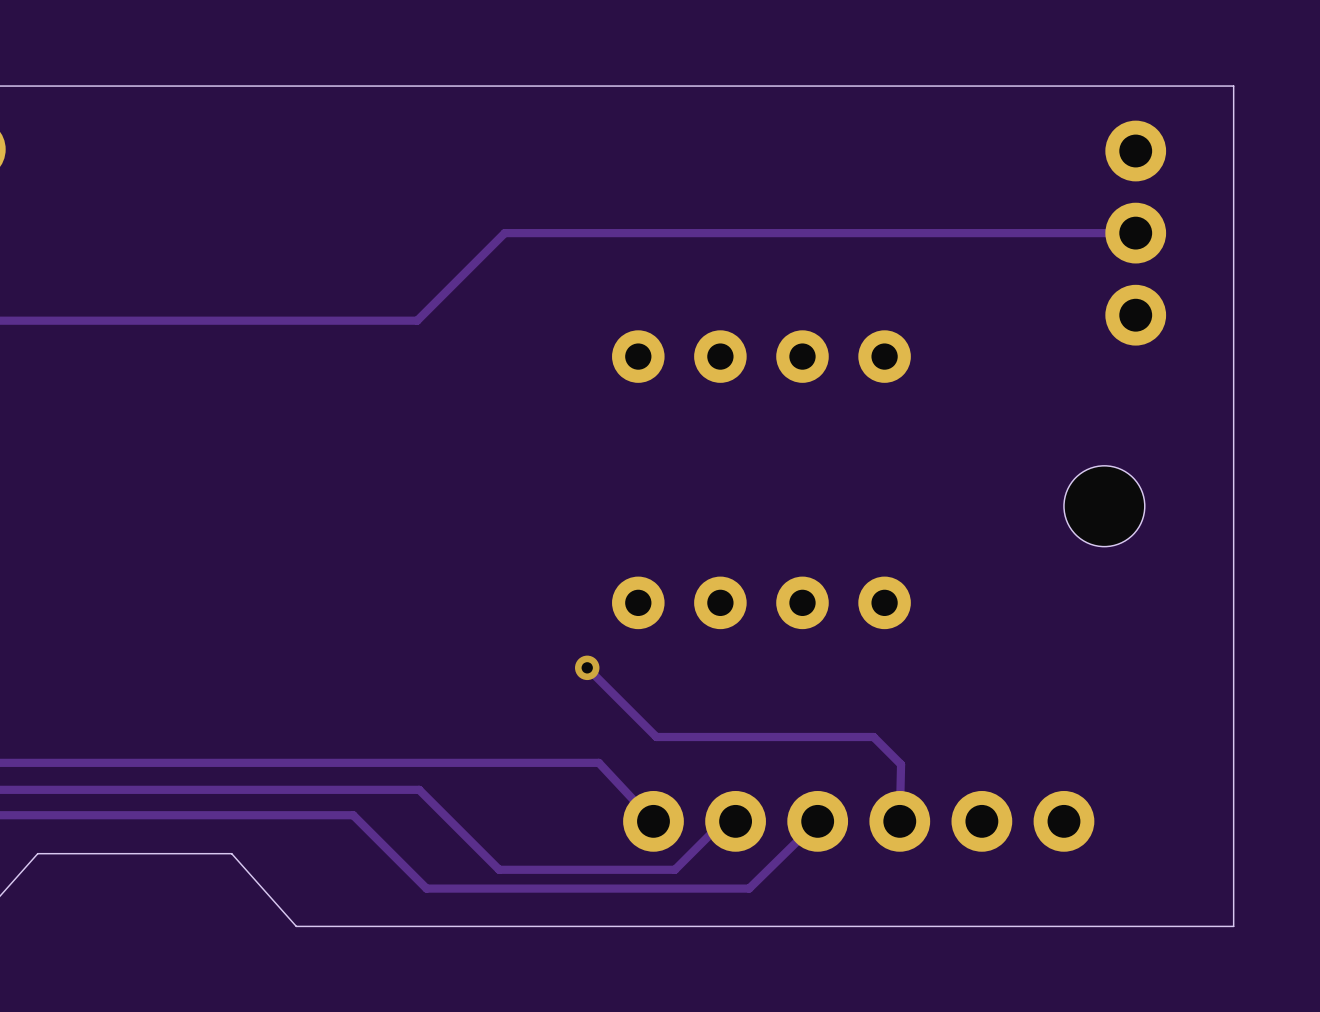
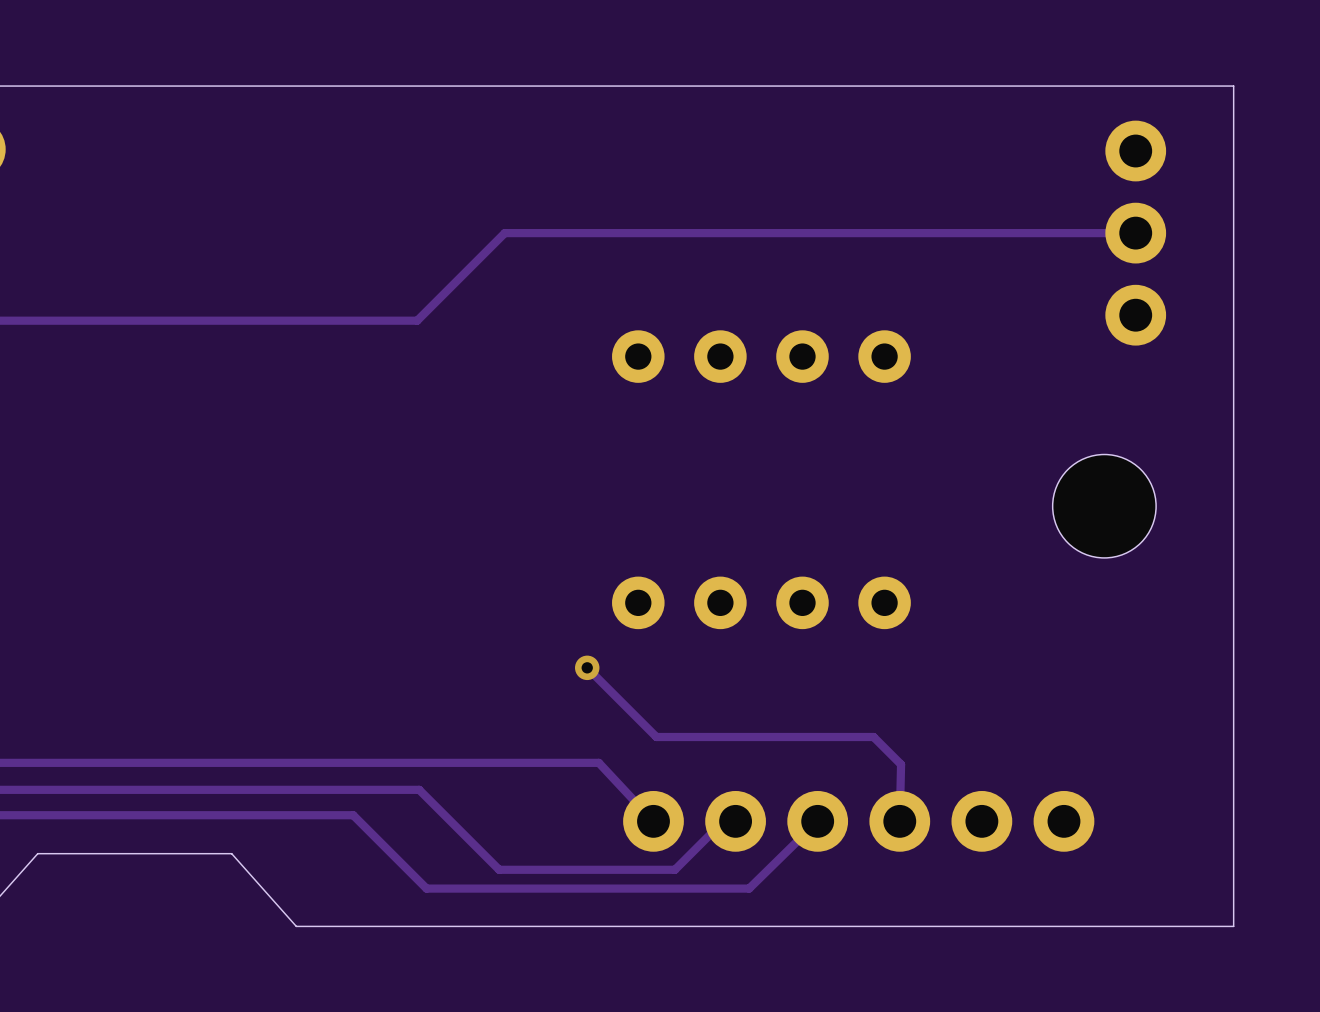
hole size: [1063, 465, 1145, 547] -> [1052, 454, 1157, 558]

